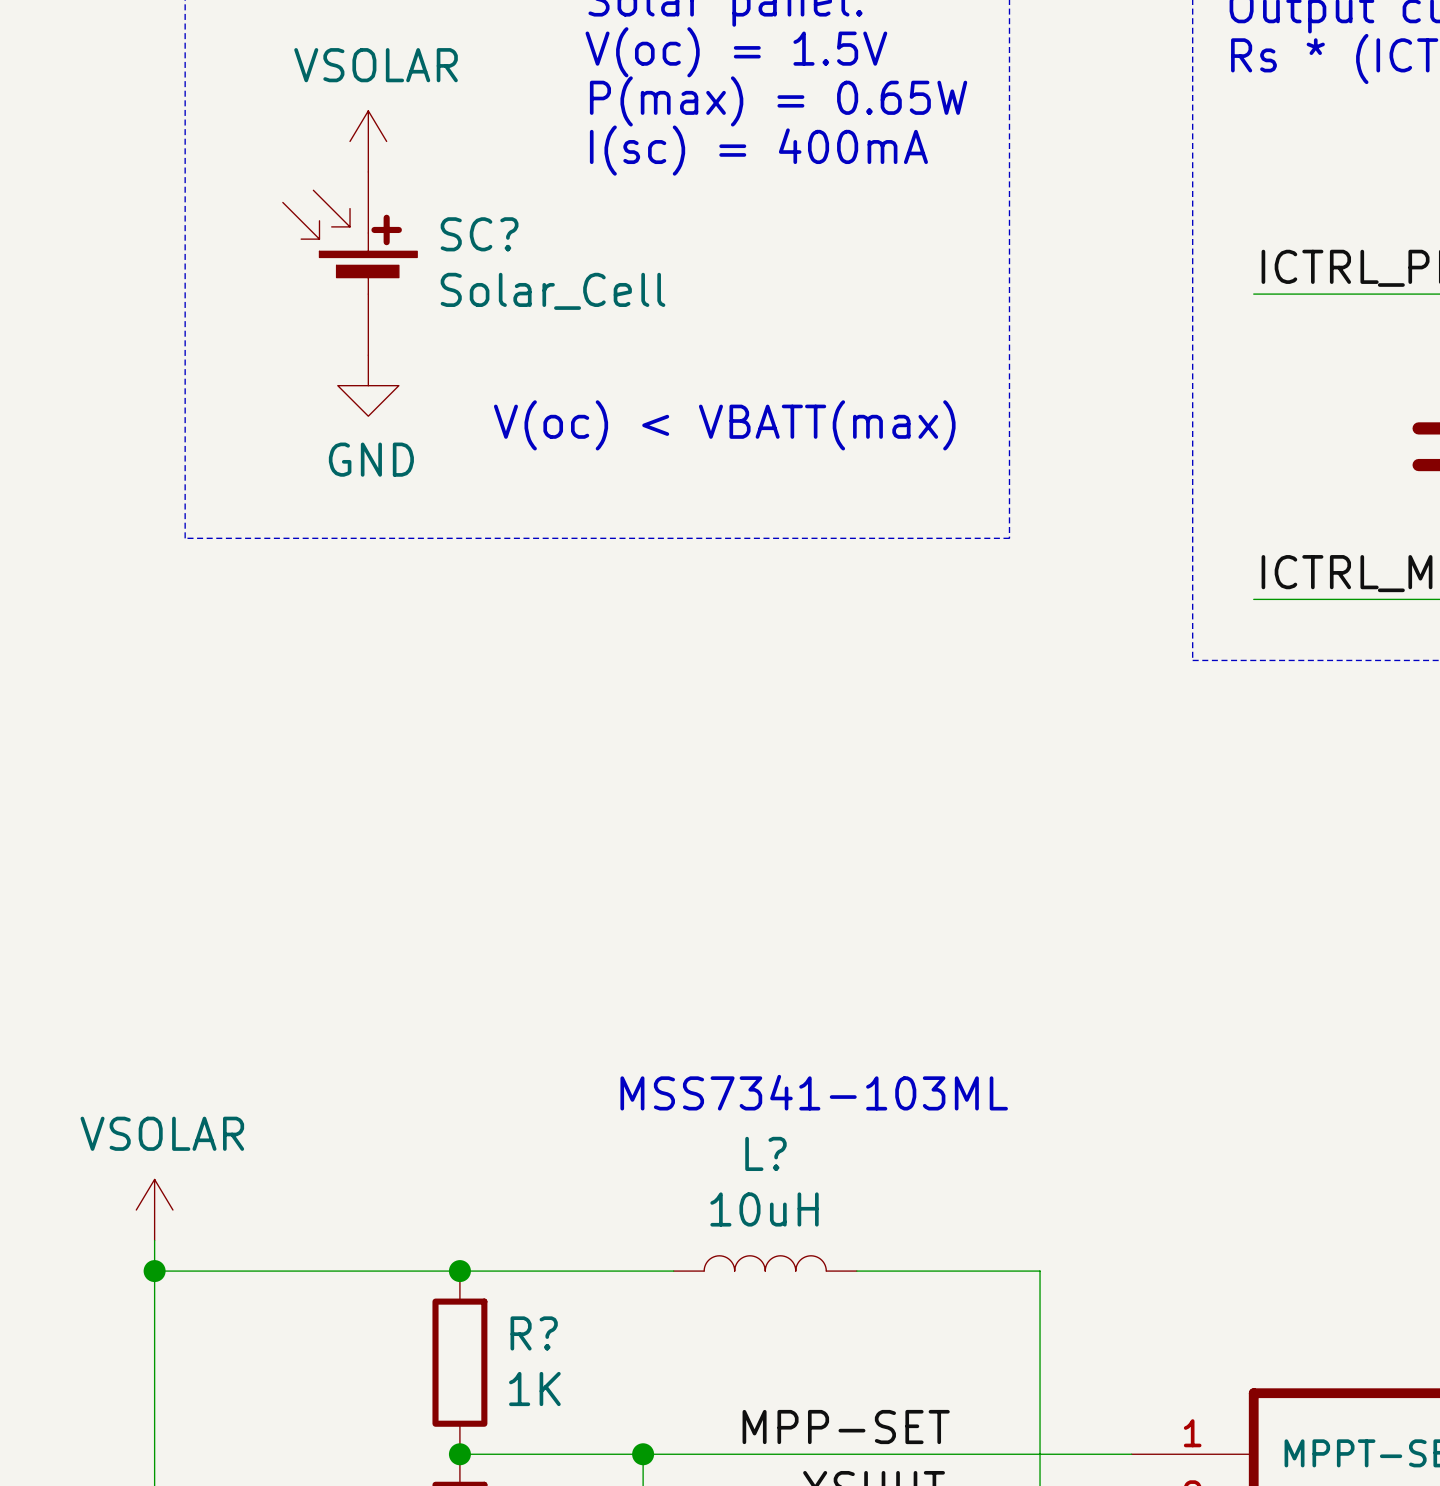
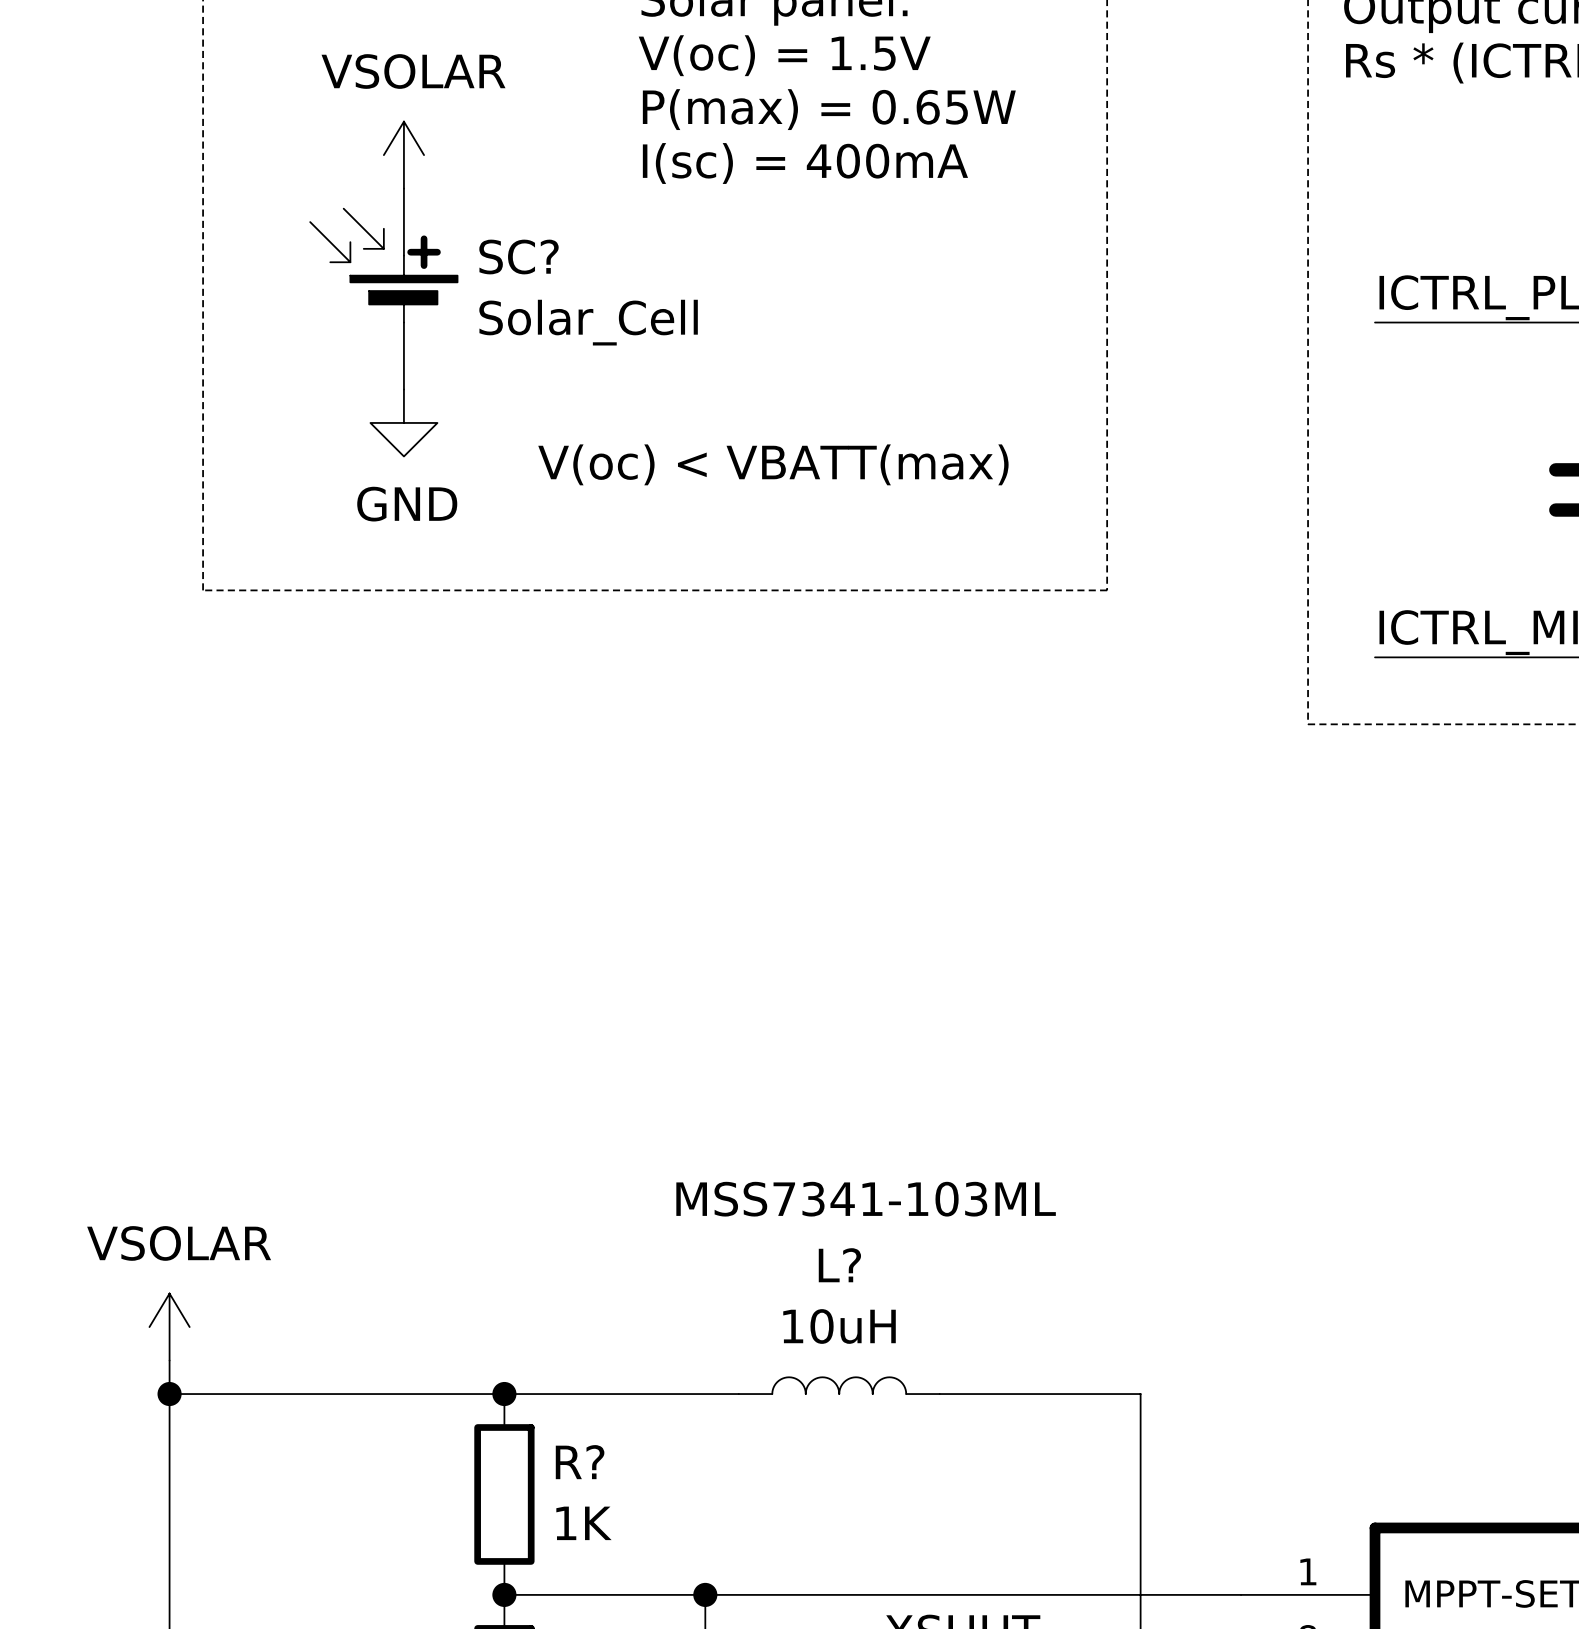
label: MPP-SET (846, 1427) -> none

